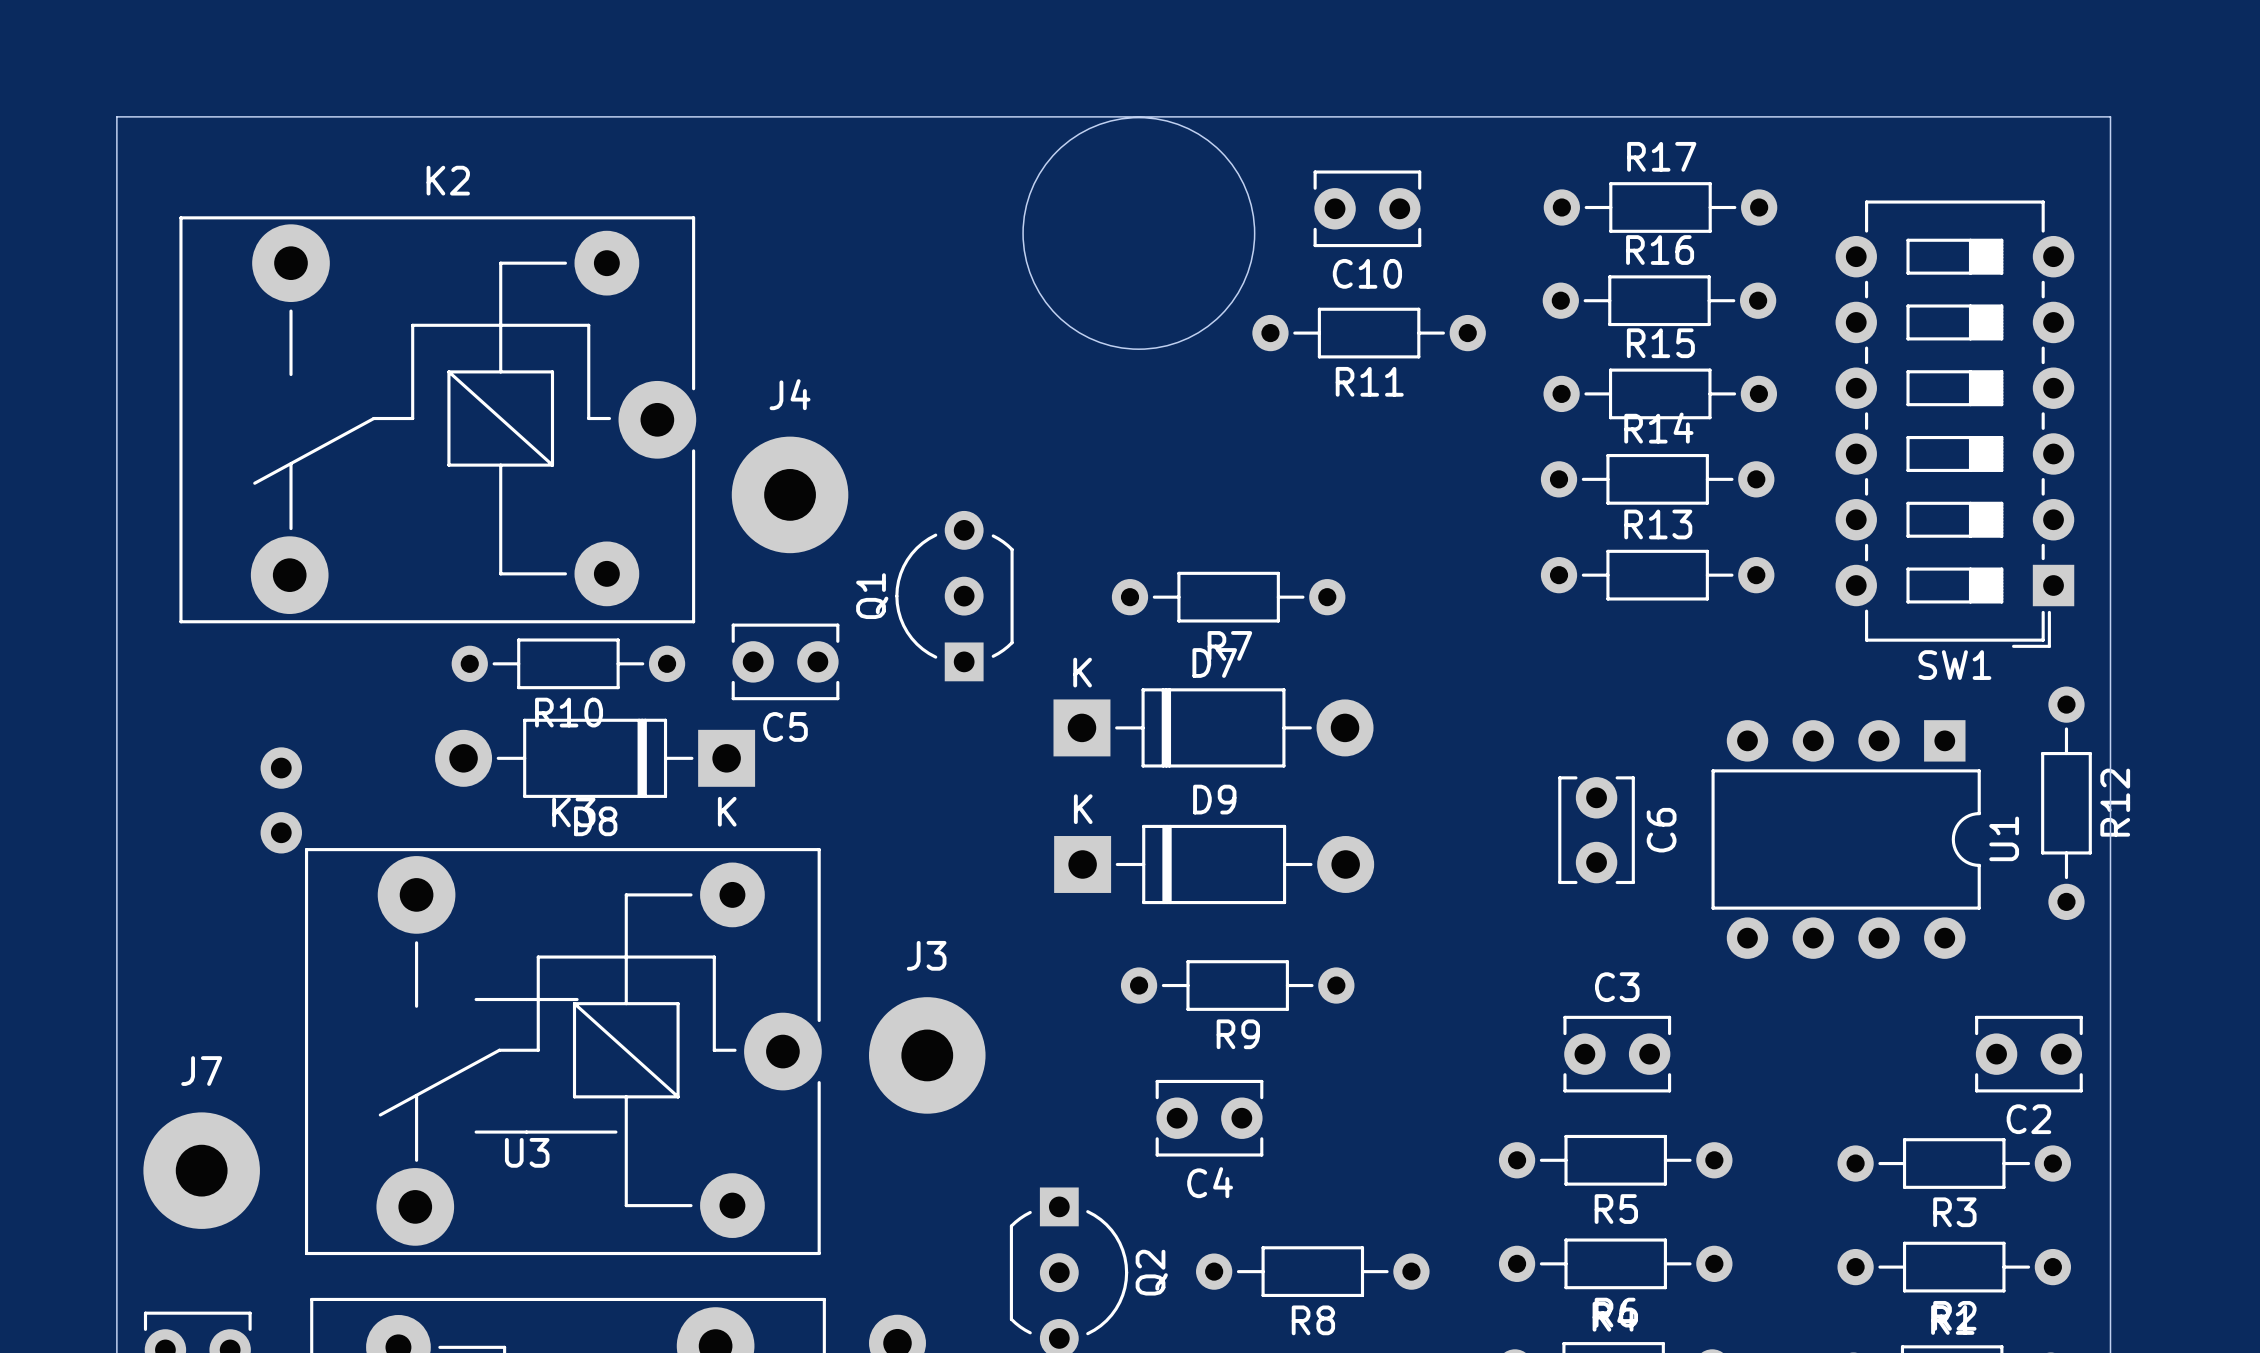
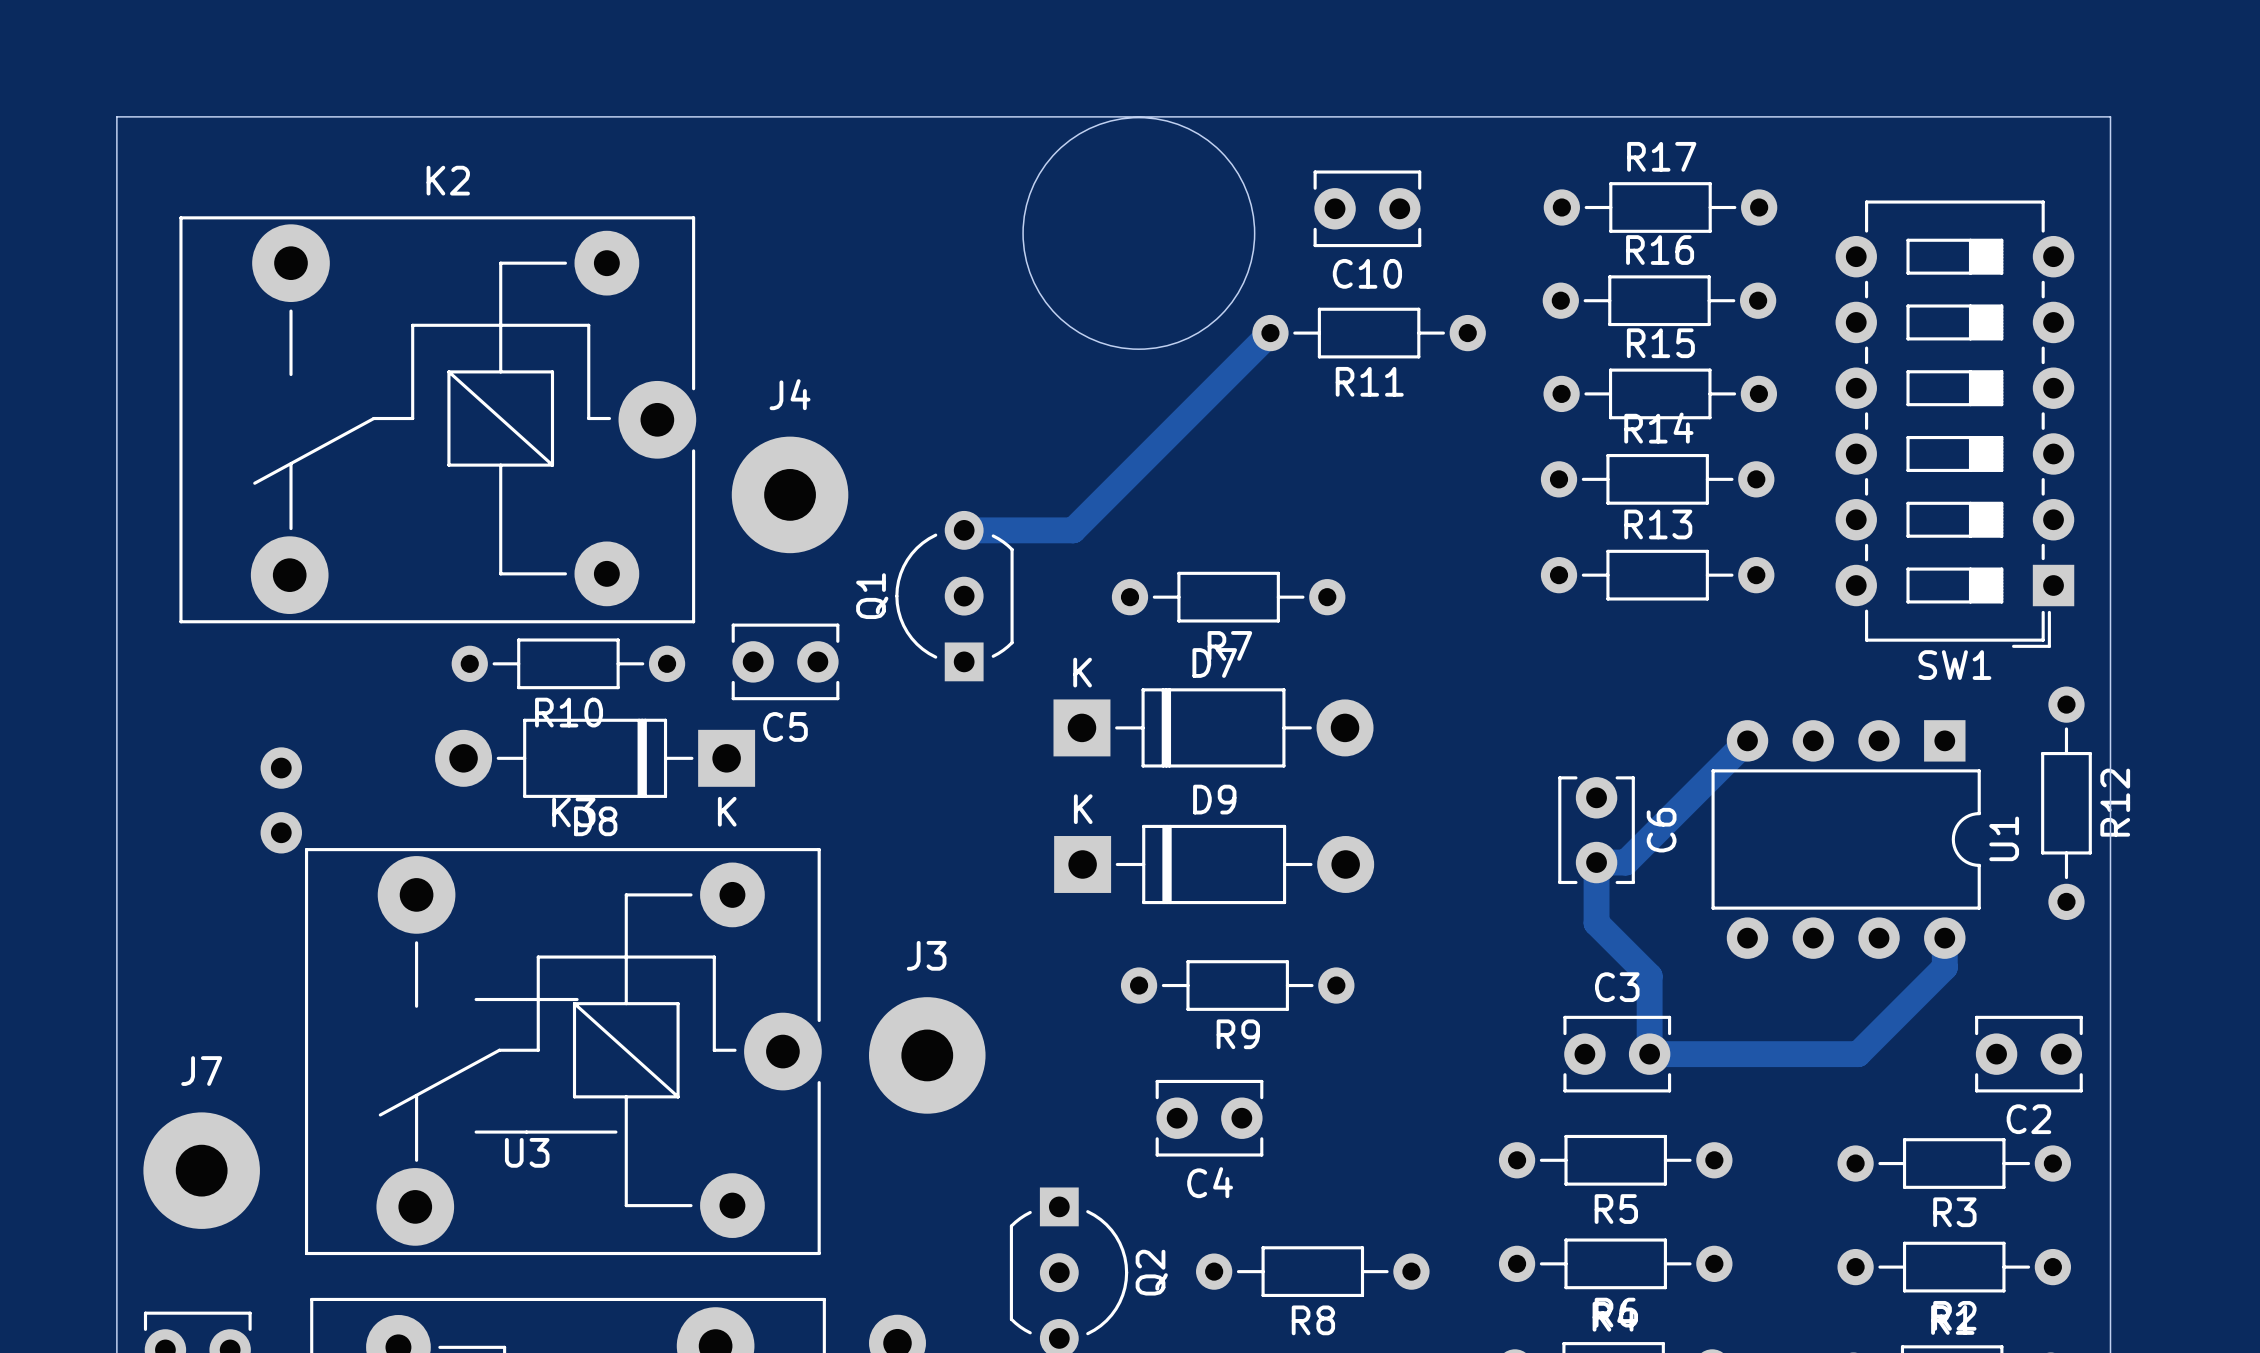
track: none -> (1270, 333) (1073, 530) (964, 530)
track: none -> (1747, 740) (1625, 862) (1596, 862) (1596, 923) (1649, 976) (1649, 1054) (1858, 1054) (1944, 967) (1944, 938)

